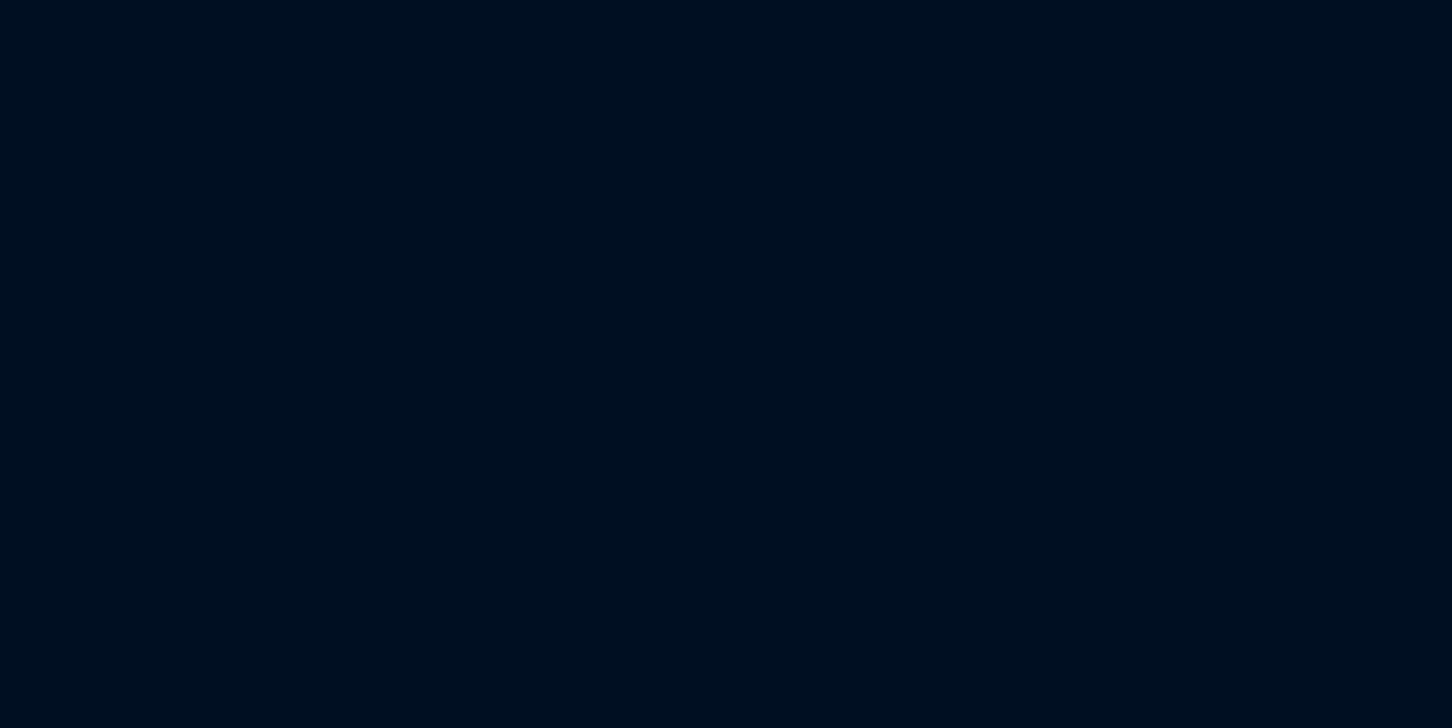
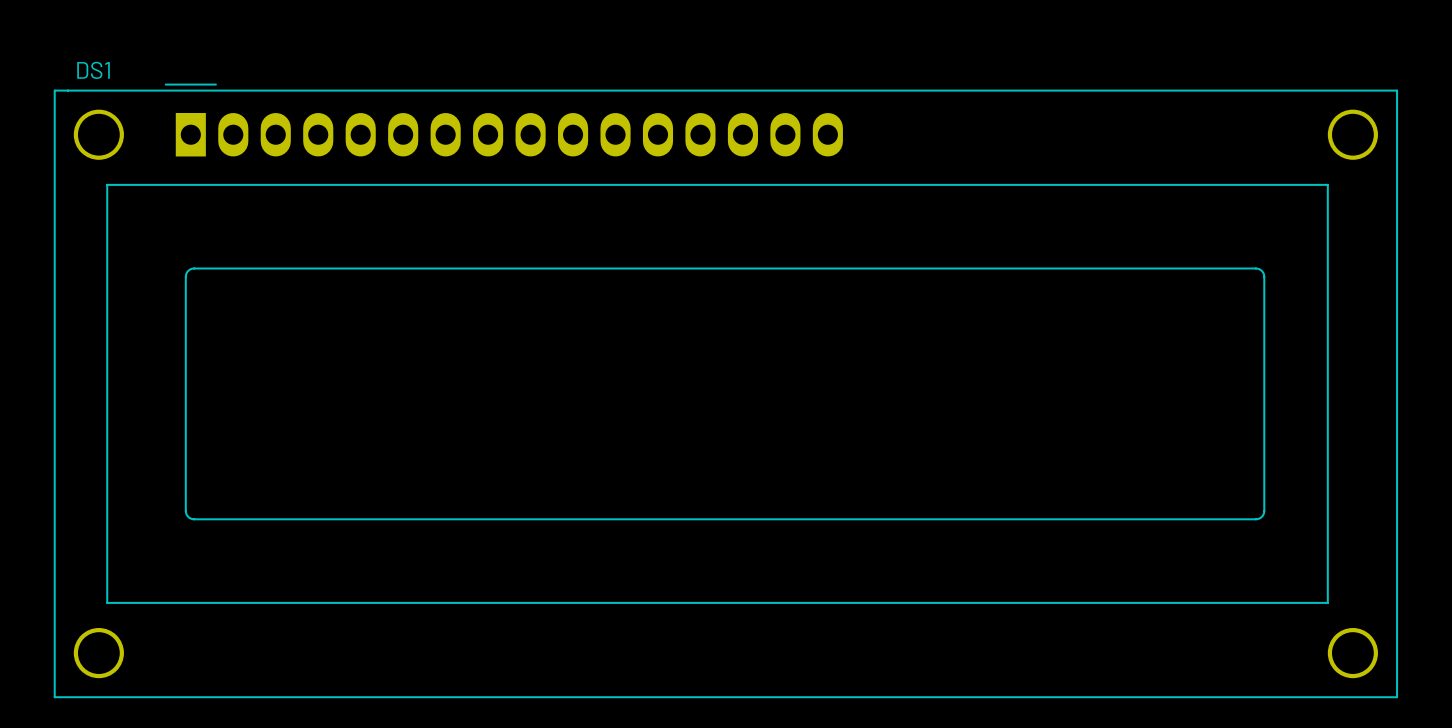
DS1: none -> (725, 390)

